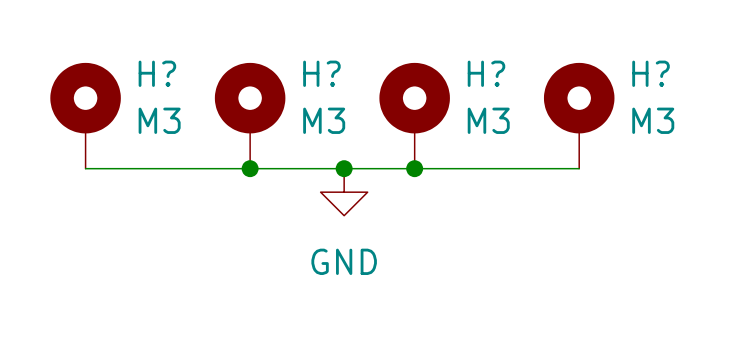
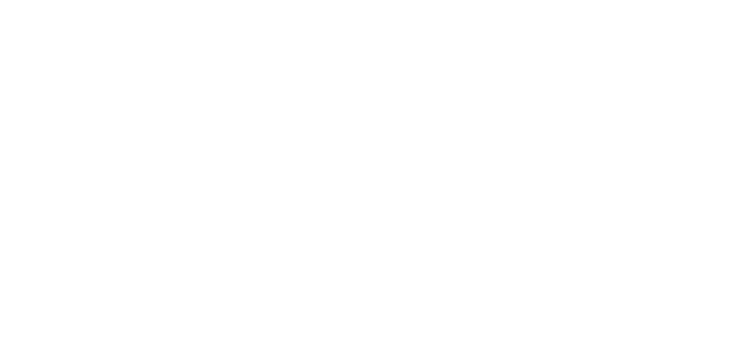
H?: M3 (85, 115) -> none
H?: M3 (250, 115) -> none
H?: M3 (414, 115) -> none
H?: M3 (579, 115) -> none
wire: (85, 168) (579, 168) -> none
junction: (250, 168) -> none
junction: (344, 168) -> none
junction: (414, 168) -> none
power symbol: GND (344, 192) -> none

